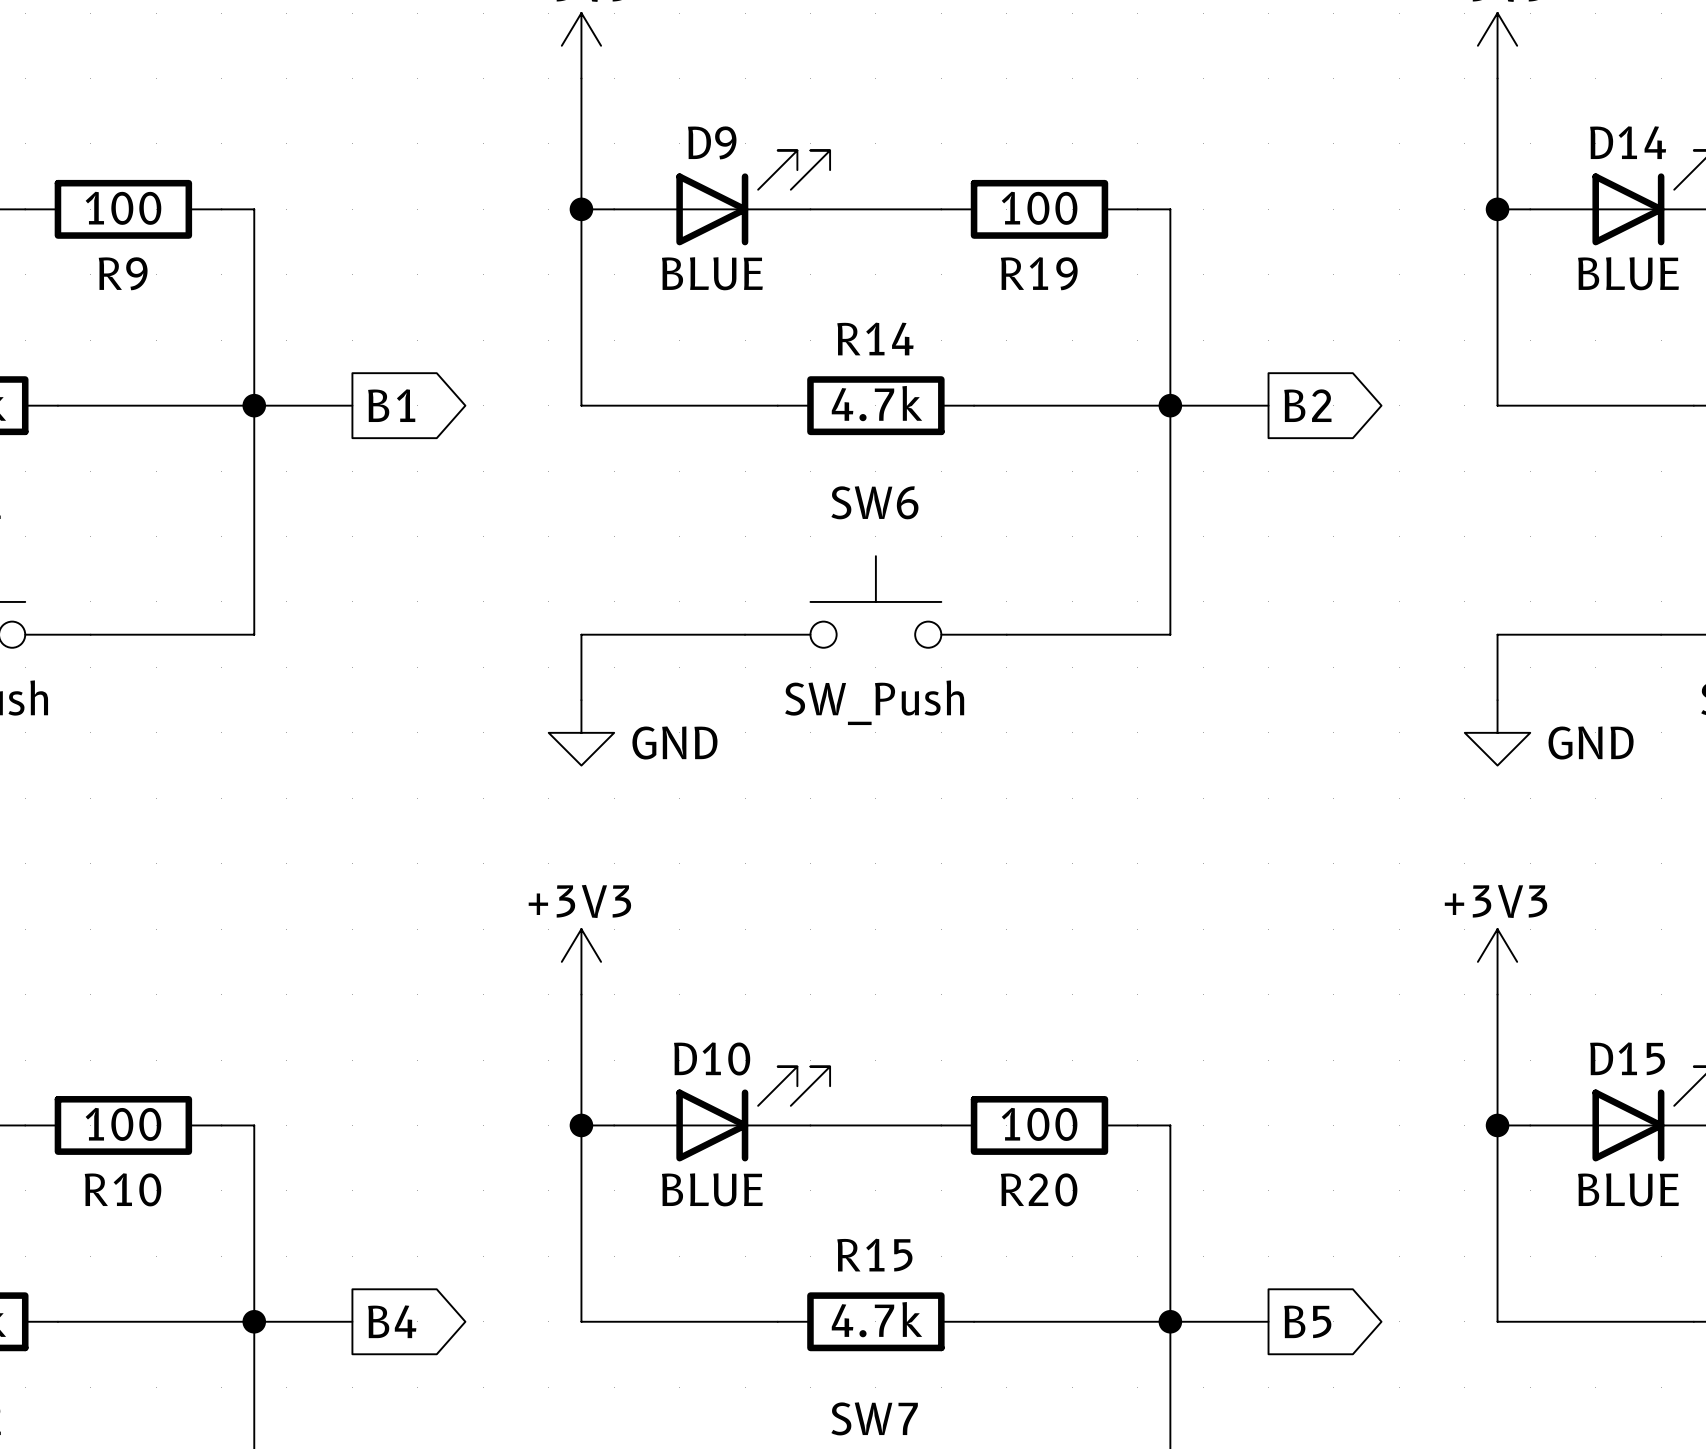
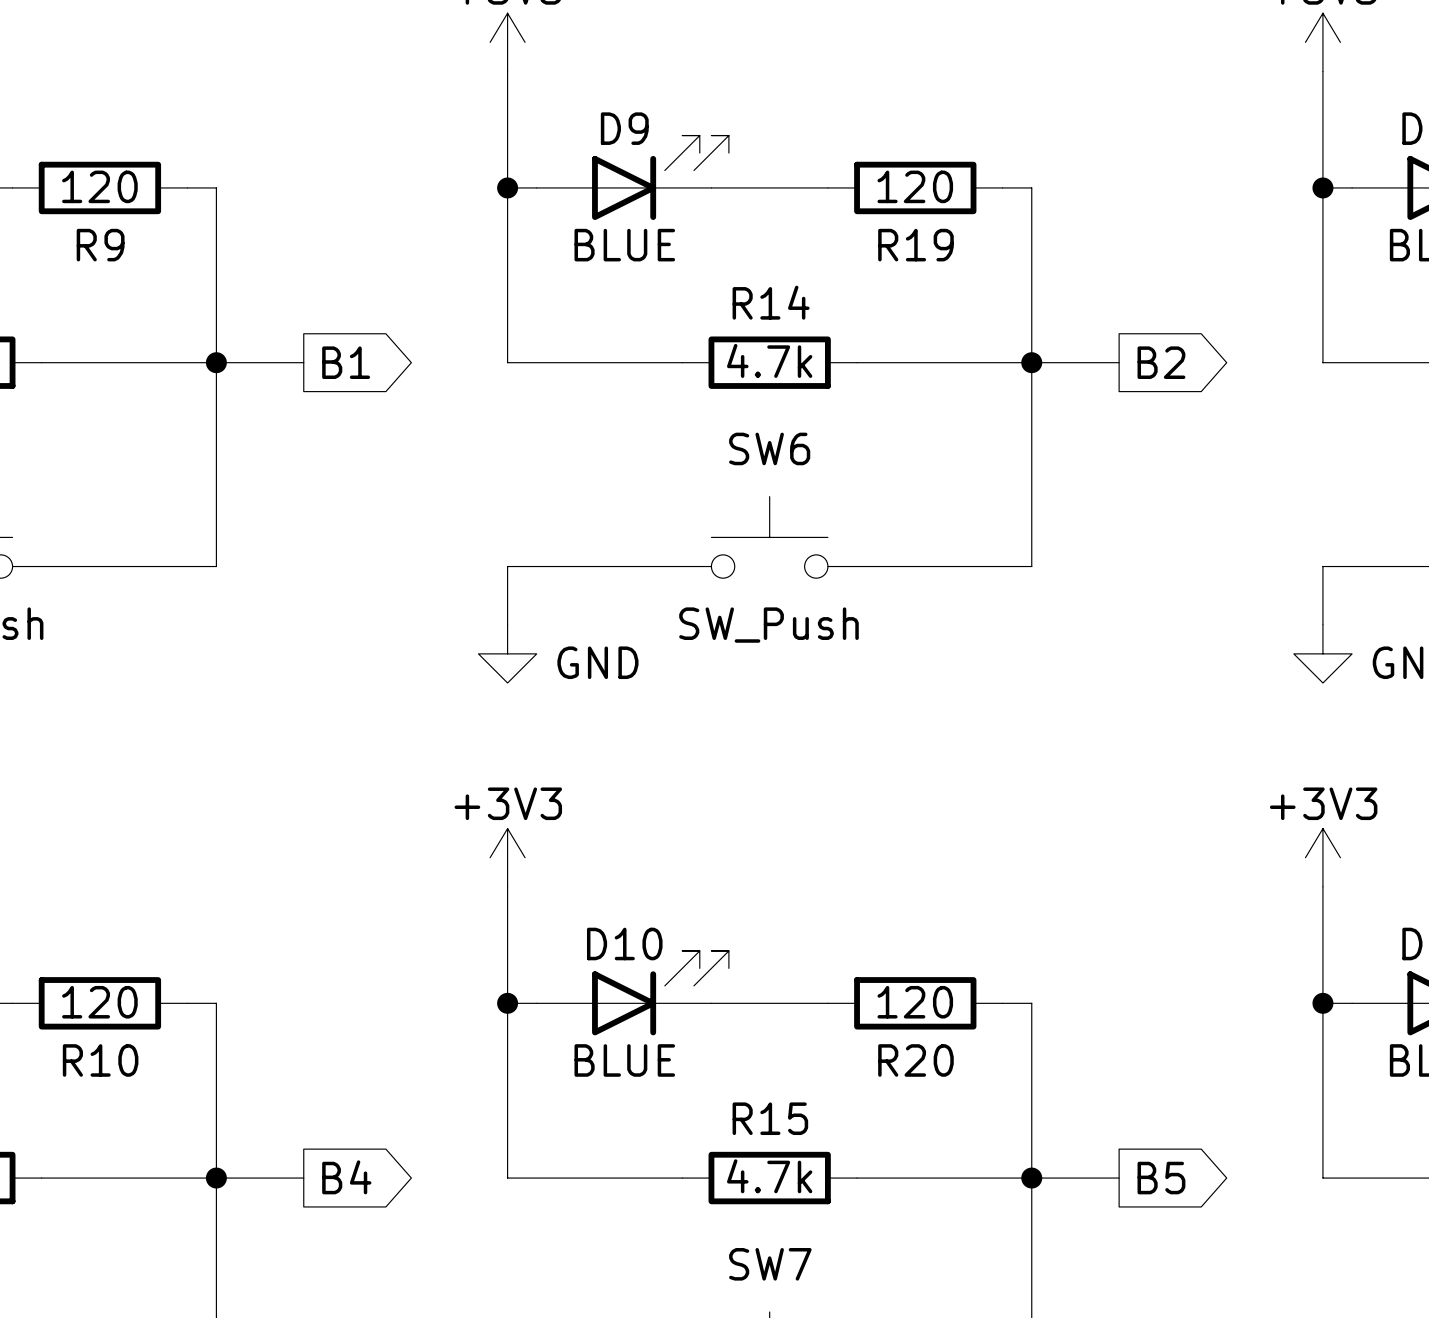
R9 value: 100 (123, 208) -> 120 (99, 186)
R19 value: 100 (1039, 208) -> 120 (915, 186)
R10 value: 100 (123, 1124) -> 120 (99, 1002)
R20 value: 100 (1039, 1124) -> 120 (915, 1002)

